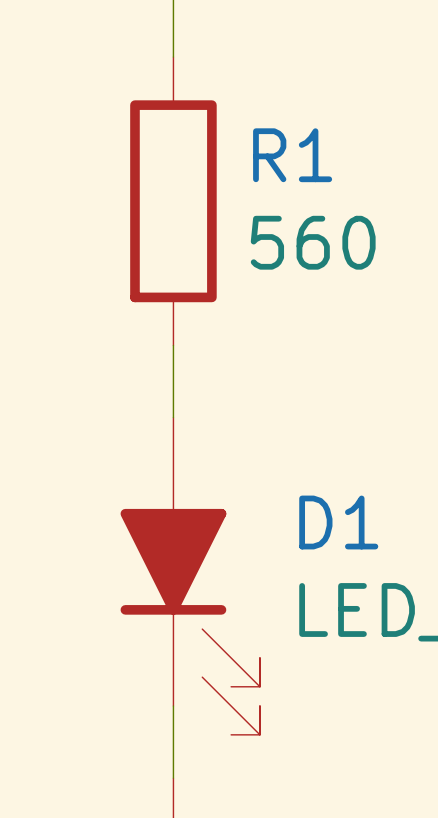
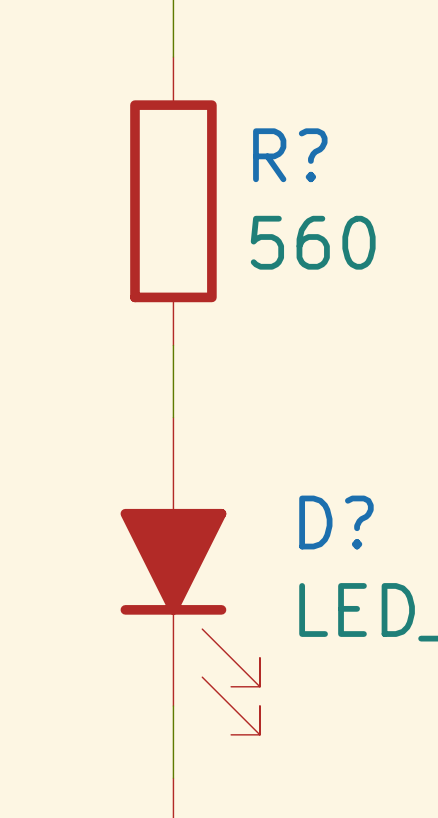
R1 name: R1 (292, 155) -> R? (290, 155)
D1 name: D1 (338, 522) -> D? (336, 522)

